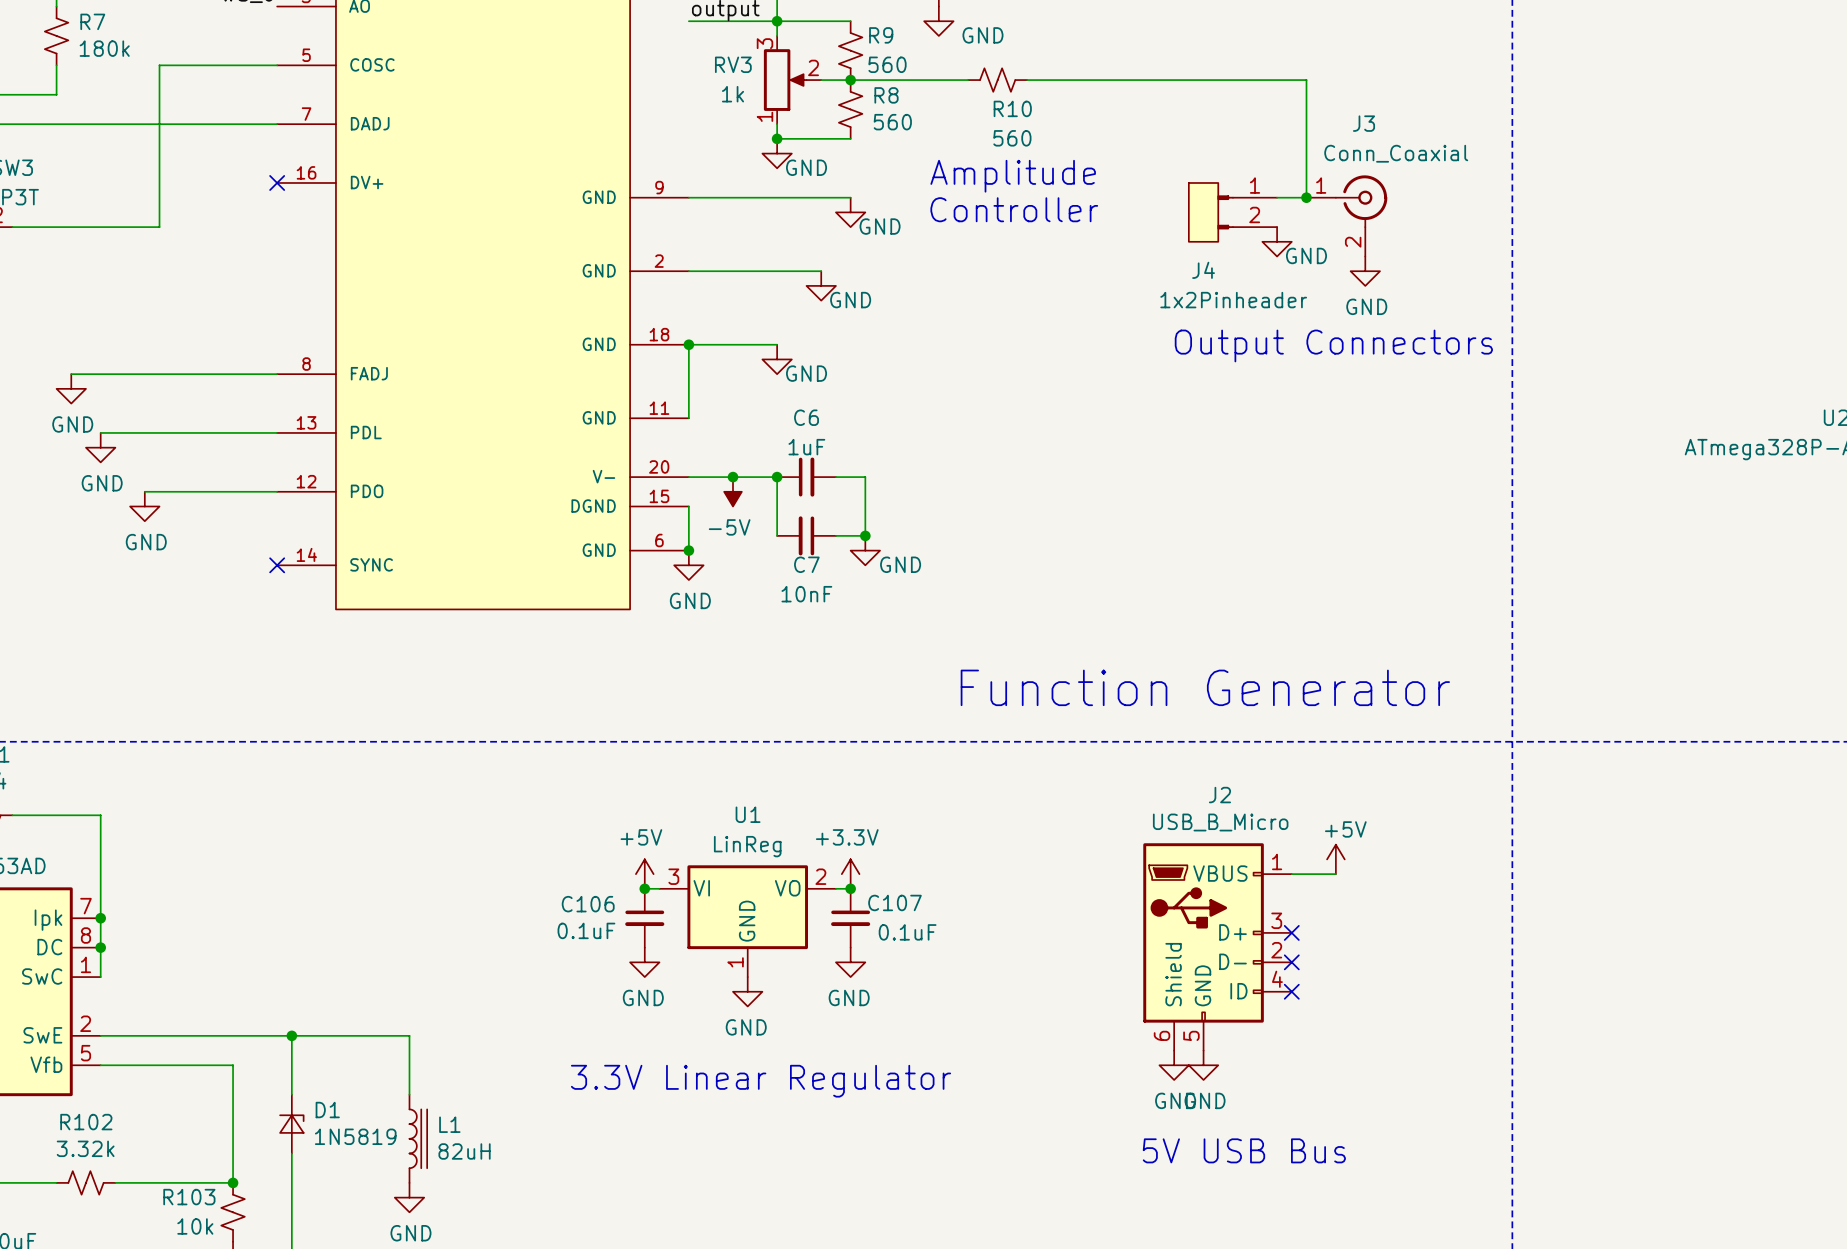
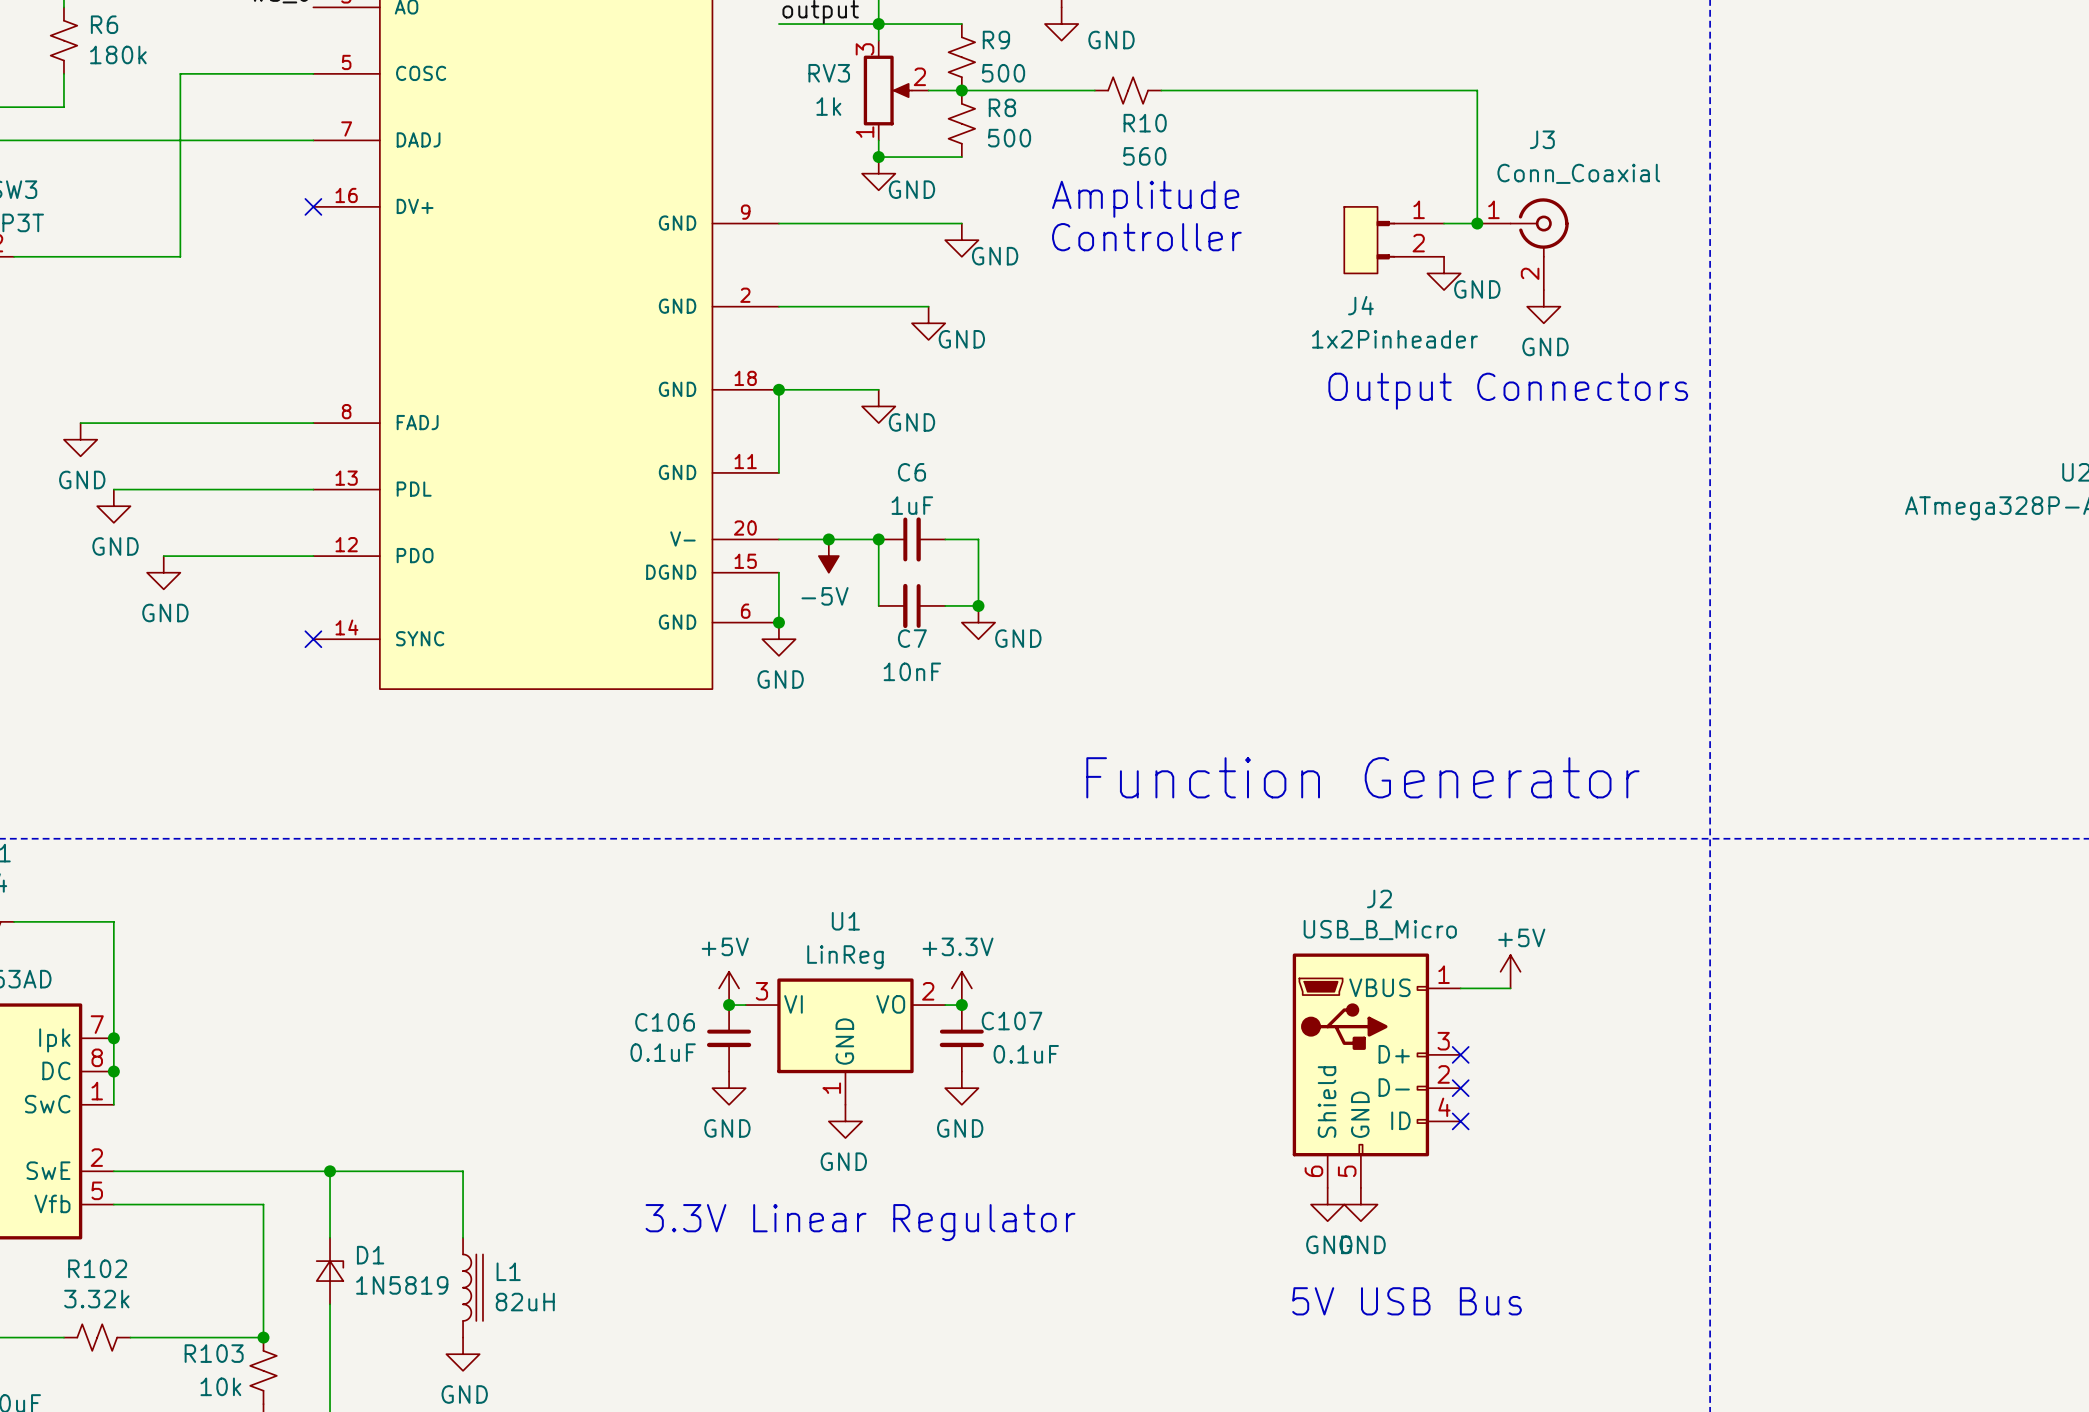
R7 name: R7 (92, 21) -> R6 (104, 24)
R9 value: 560 (887, 64) -> 500 (1003, 73)
R8 value: 560 (892, 122) -> 500 (1009, 138)

